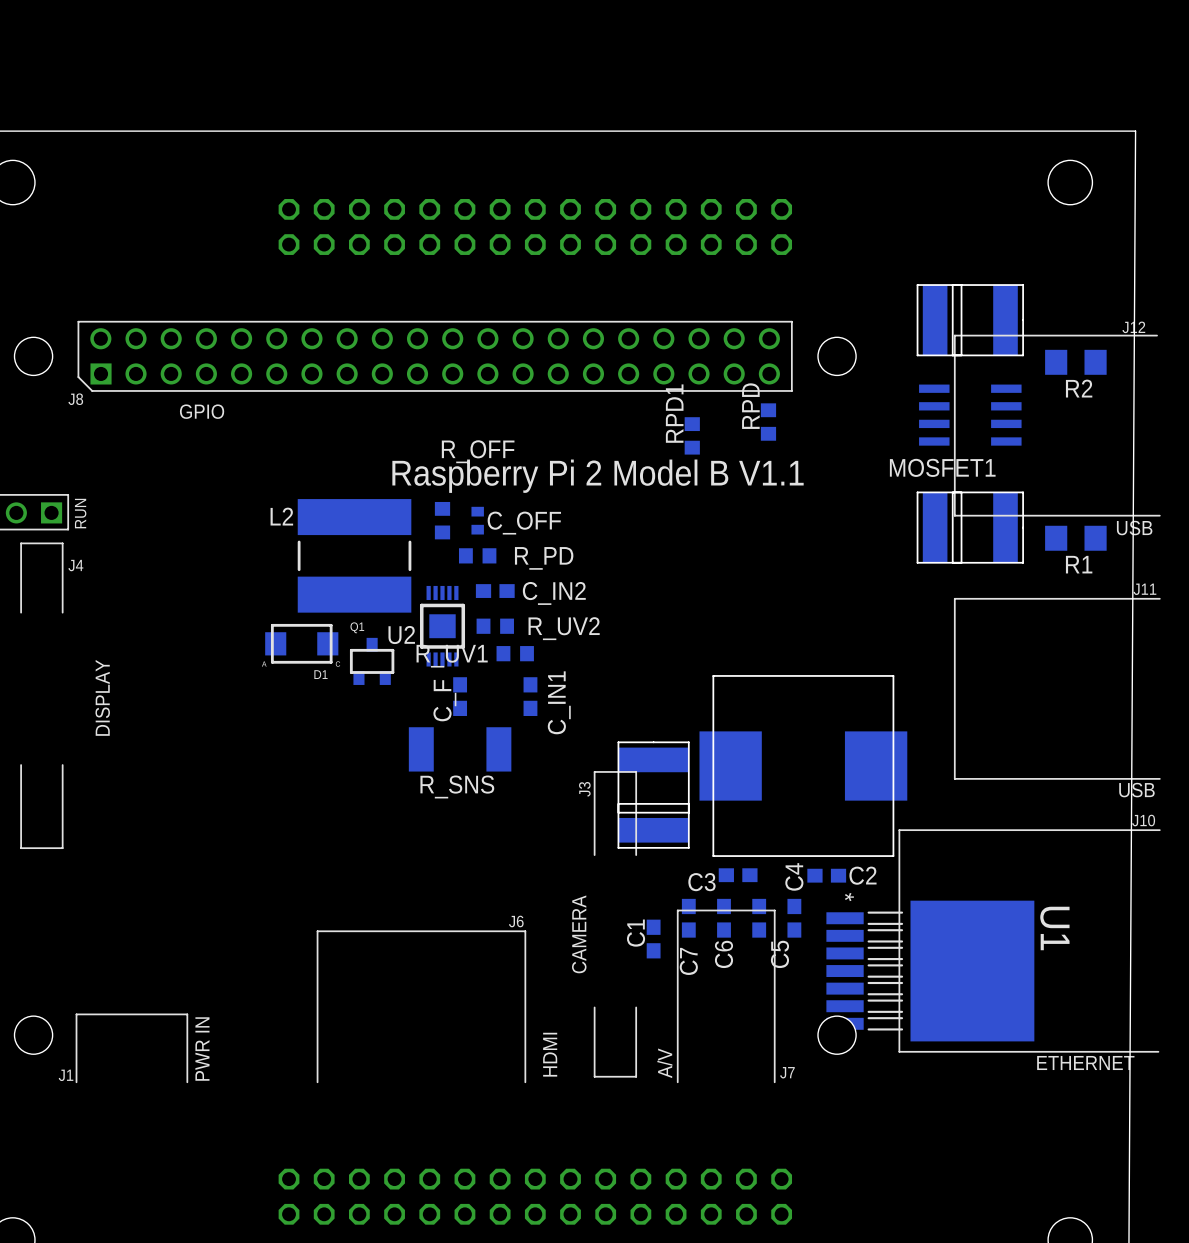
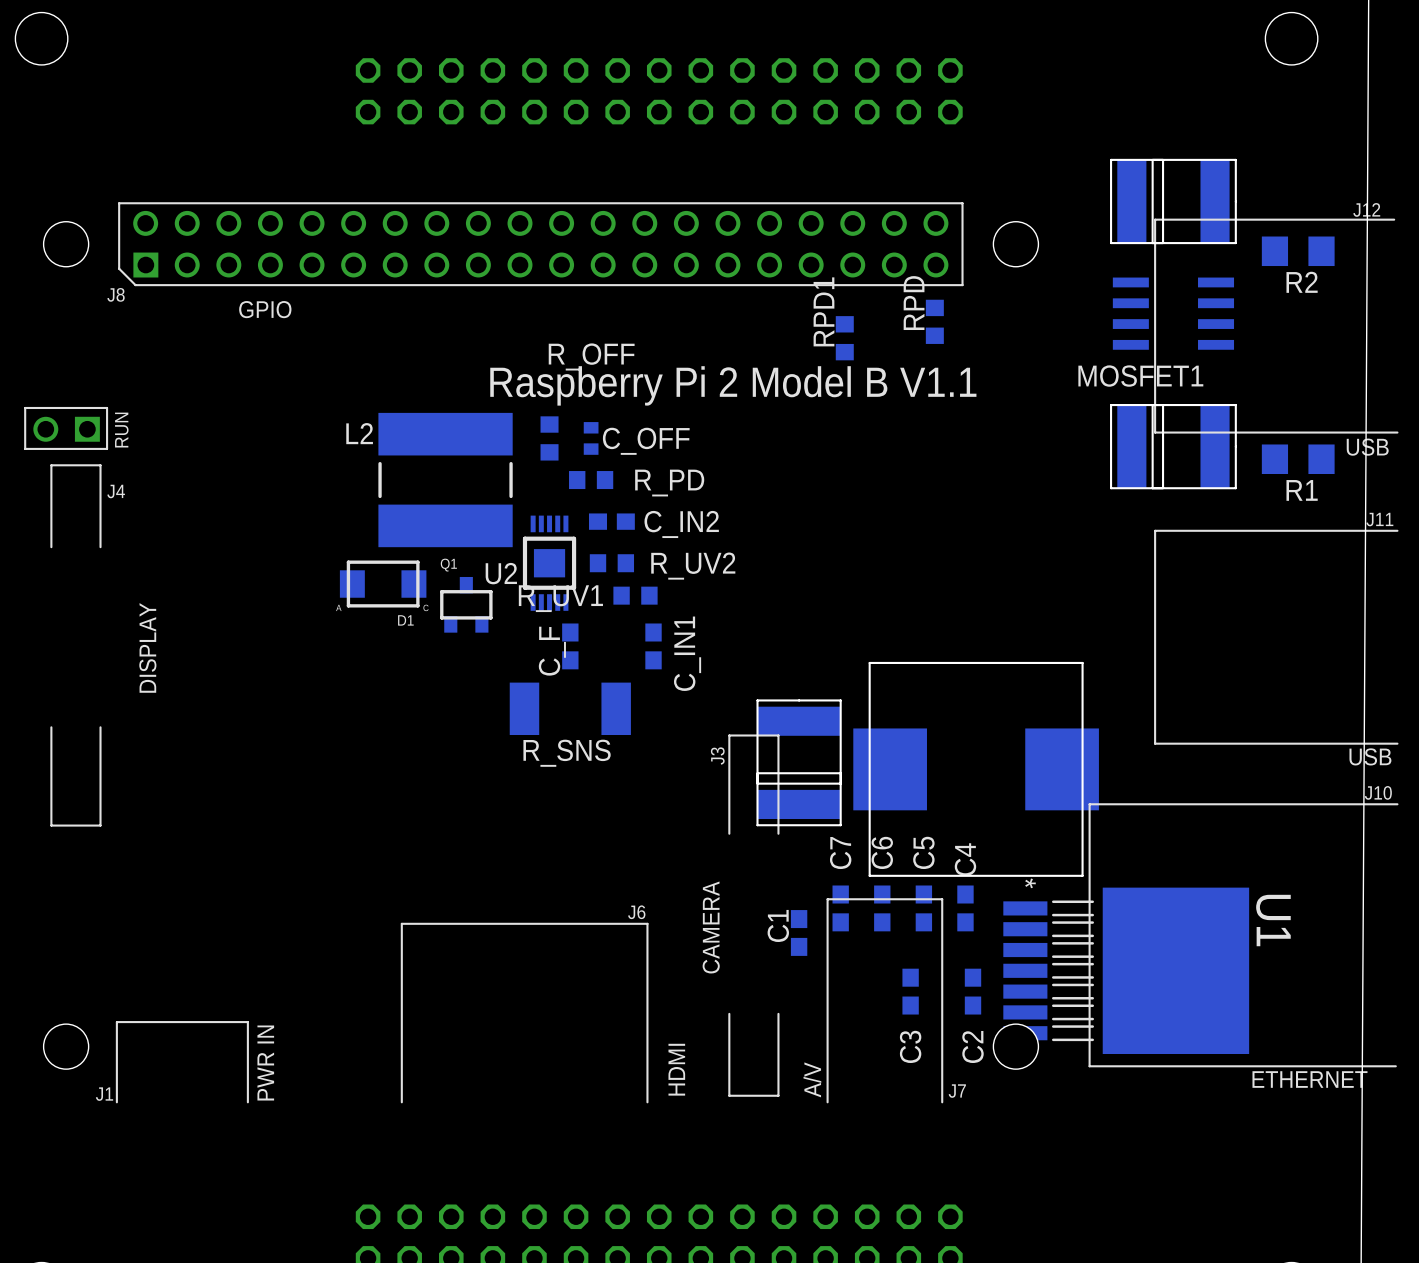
part position: (803, 766) -> (976, 769)
C3 rotation: 0° (738, 875) -> 90° clockwise (910, 991)
C3 position: (738, 875) -> (910, 991)
C2 rotation: 0° (826, 875) -> 90° clockwise (973, 991)
C2 position: (826, 875) -> (973, 991)
C3 name position: C3 (701, 882) -> C3 (910, 1046)
C6 name position: C6 (723, 954) -> C6 (882, 852)
C5 name position: C5 (779, 954) -> C5 (923, 852)
C7 name position: C7 (688, 961) -> C7 (840, 853)

